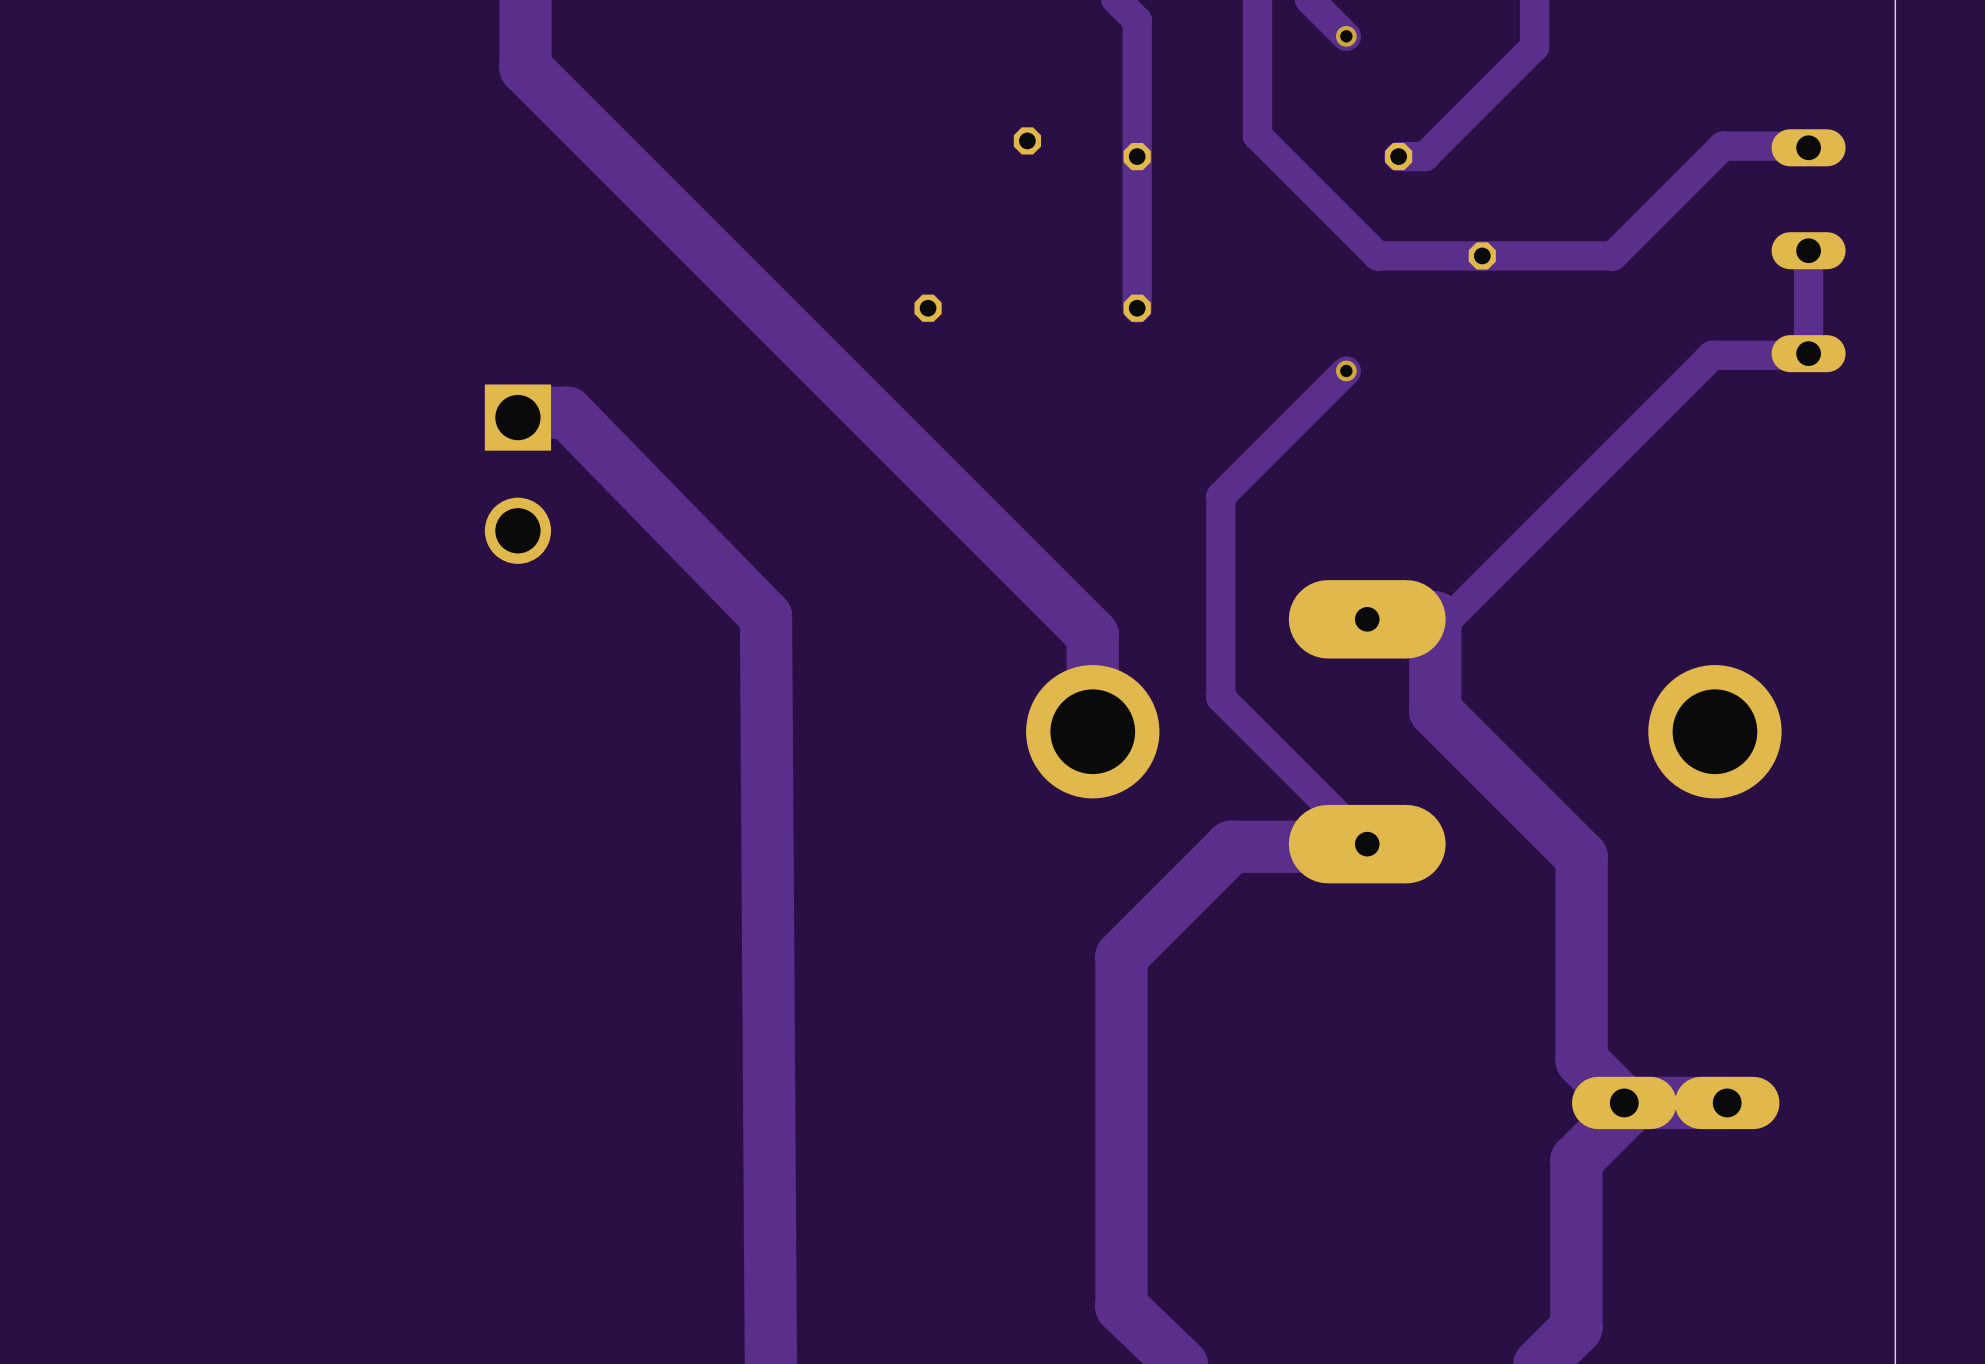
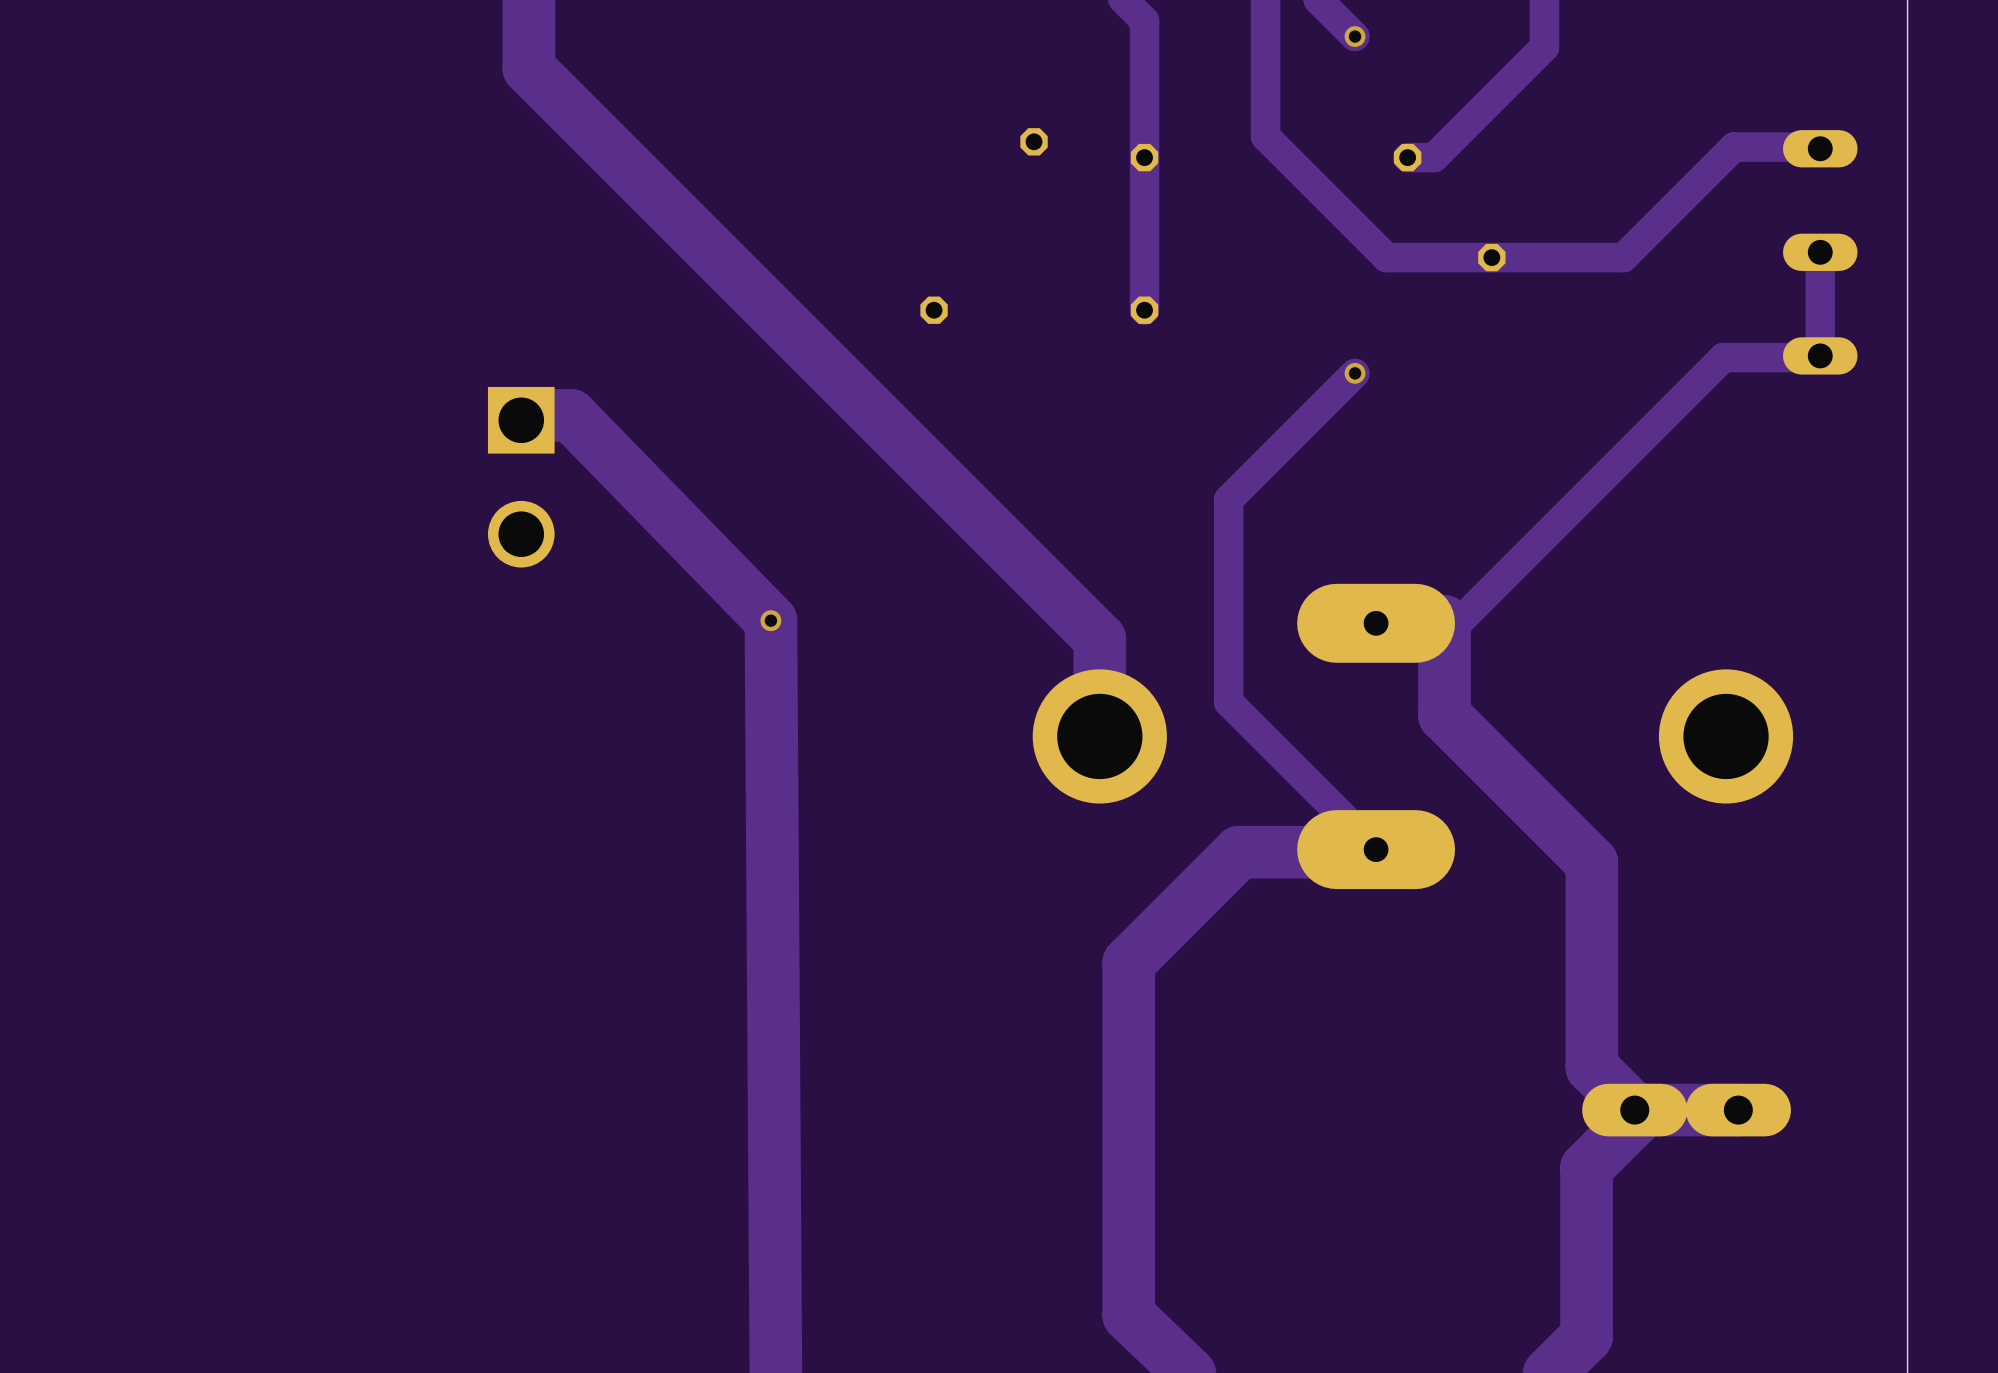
via: none -> (770, 620)

